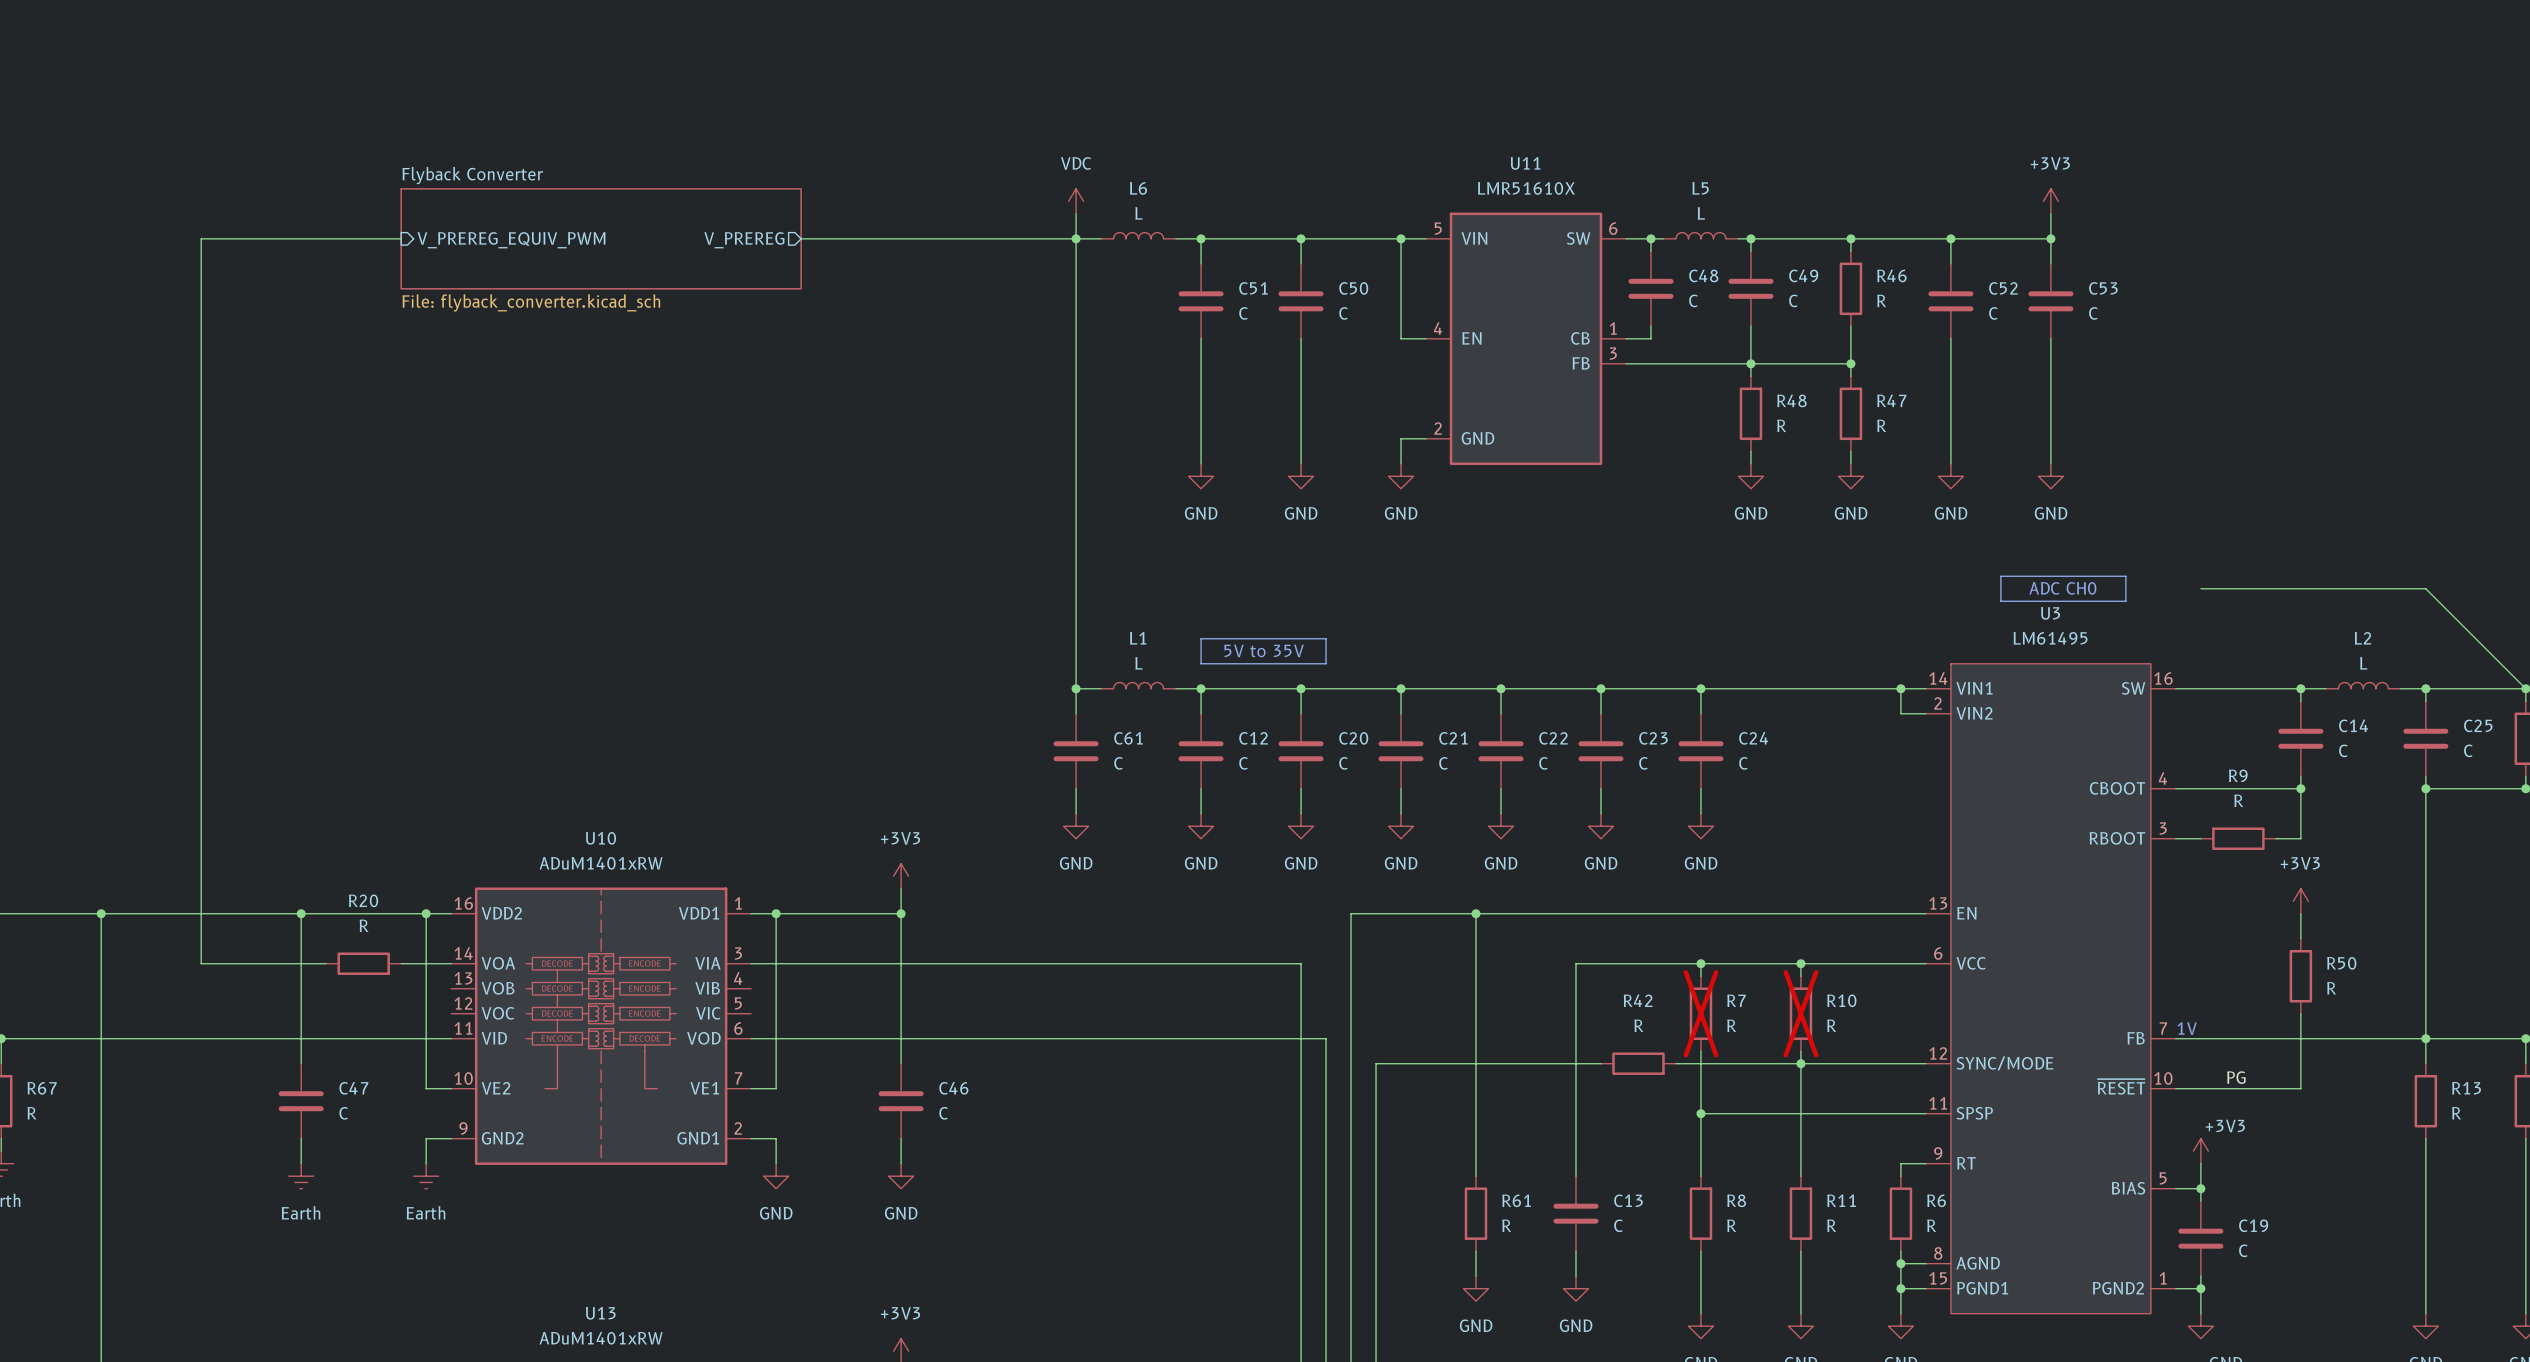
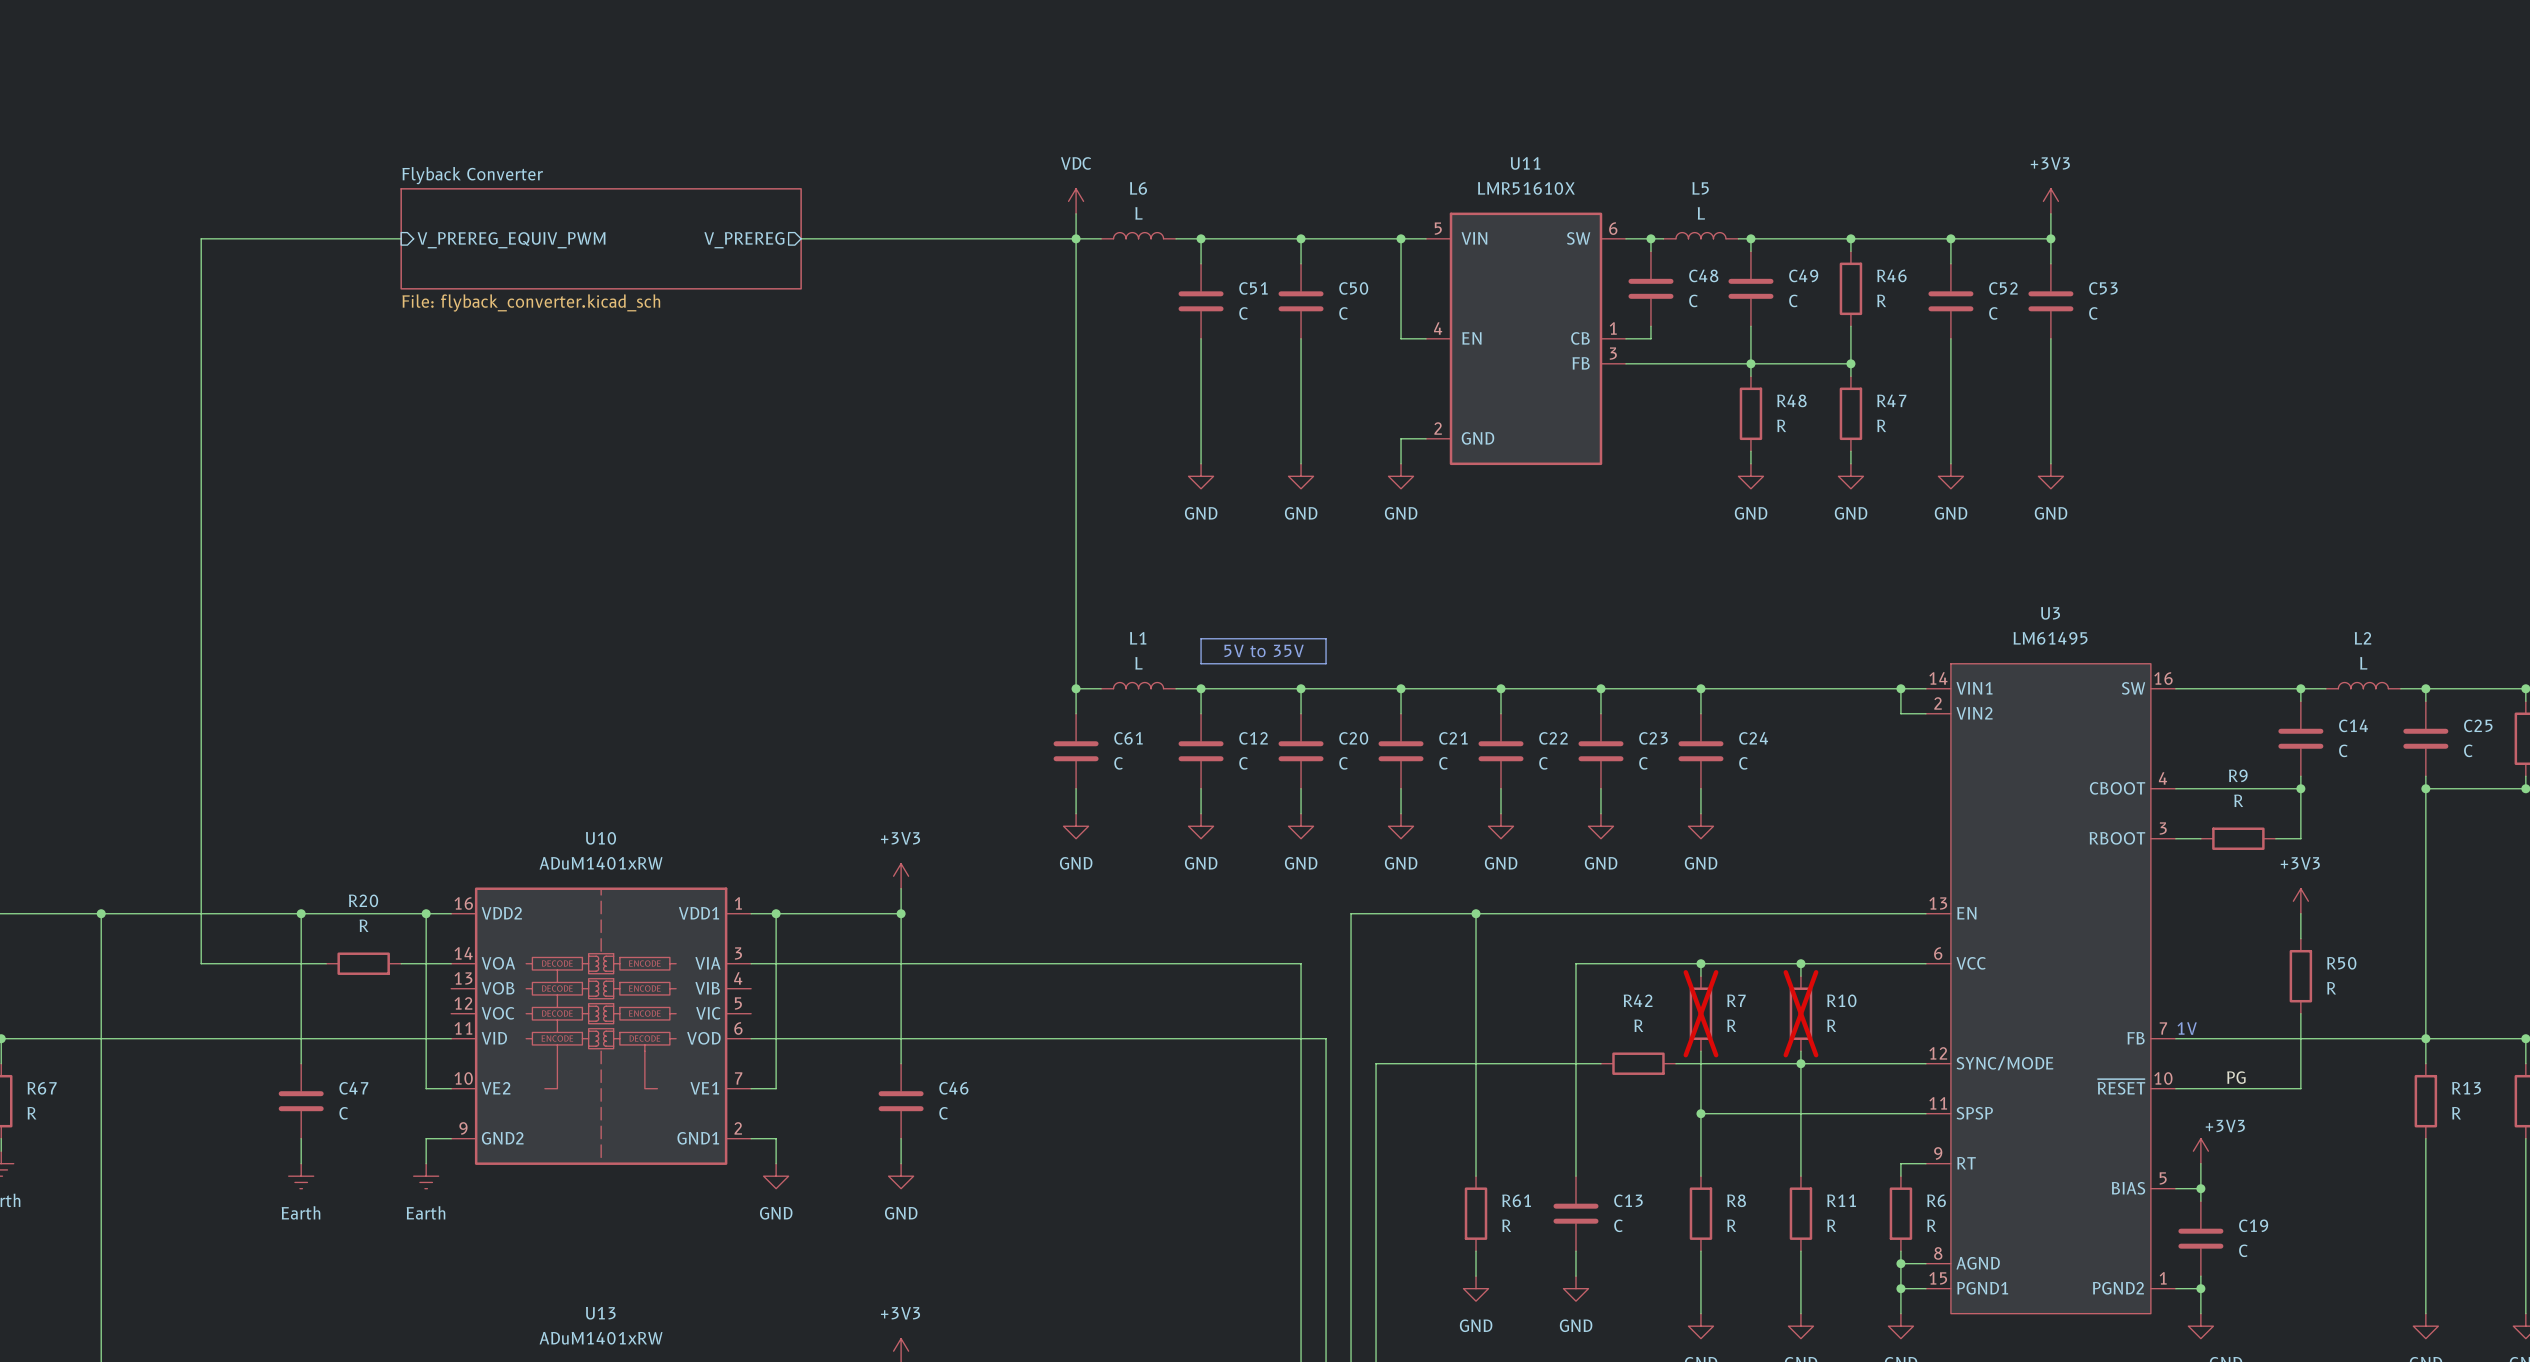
line: (2000, 576) (2125, 576) (2125, 601) (2000, 601) (2000, 576) -> none
text: ADC CH0 (2062, 588) -> none
wire: (2200, 588) (2425, 588) (2525, 688) -> none

